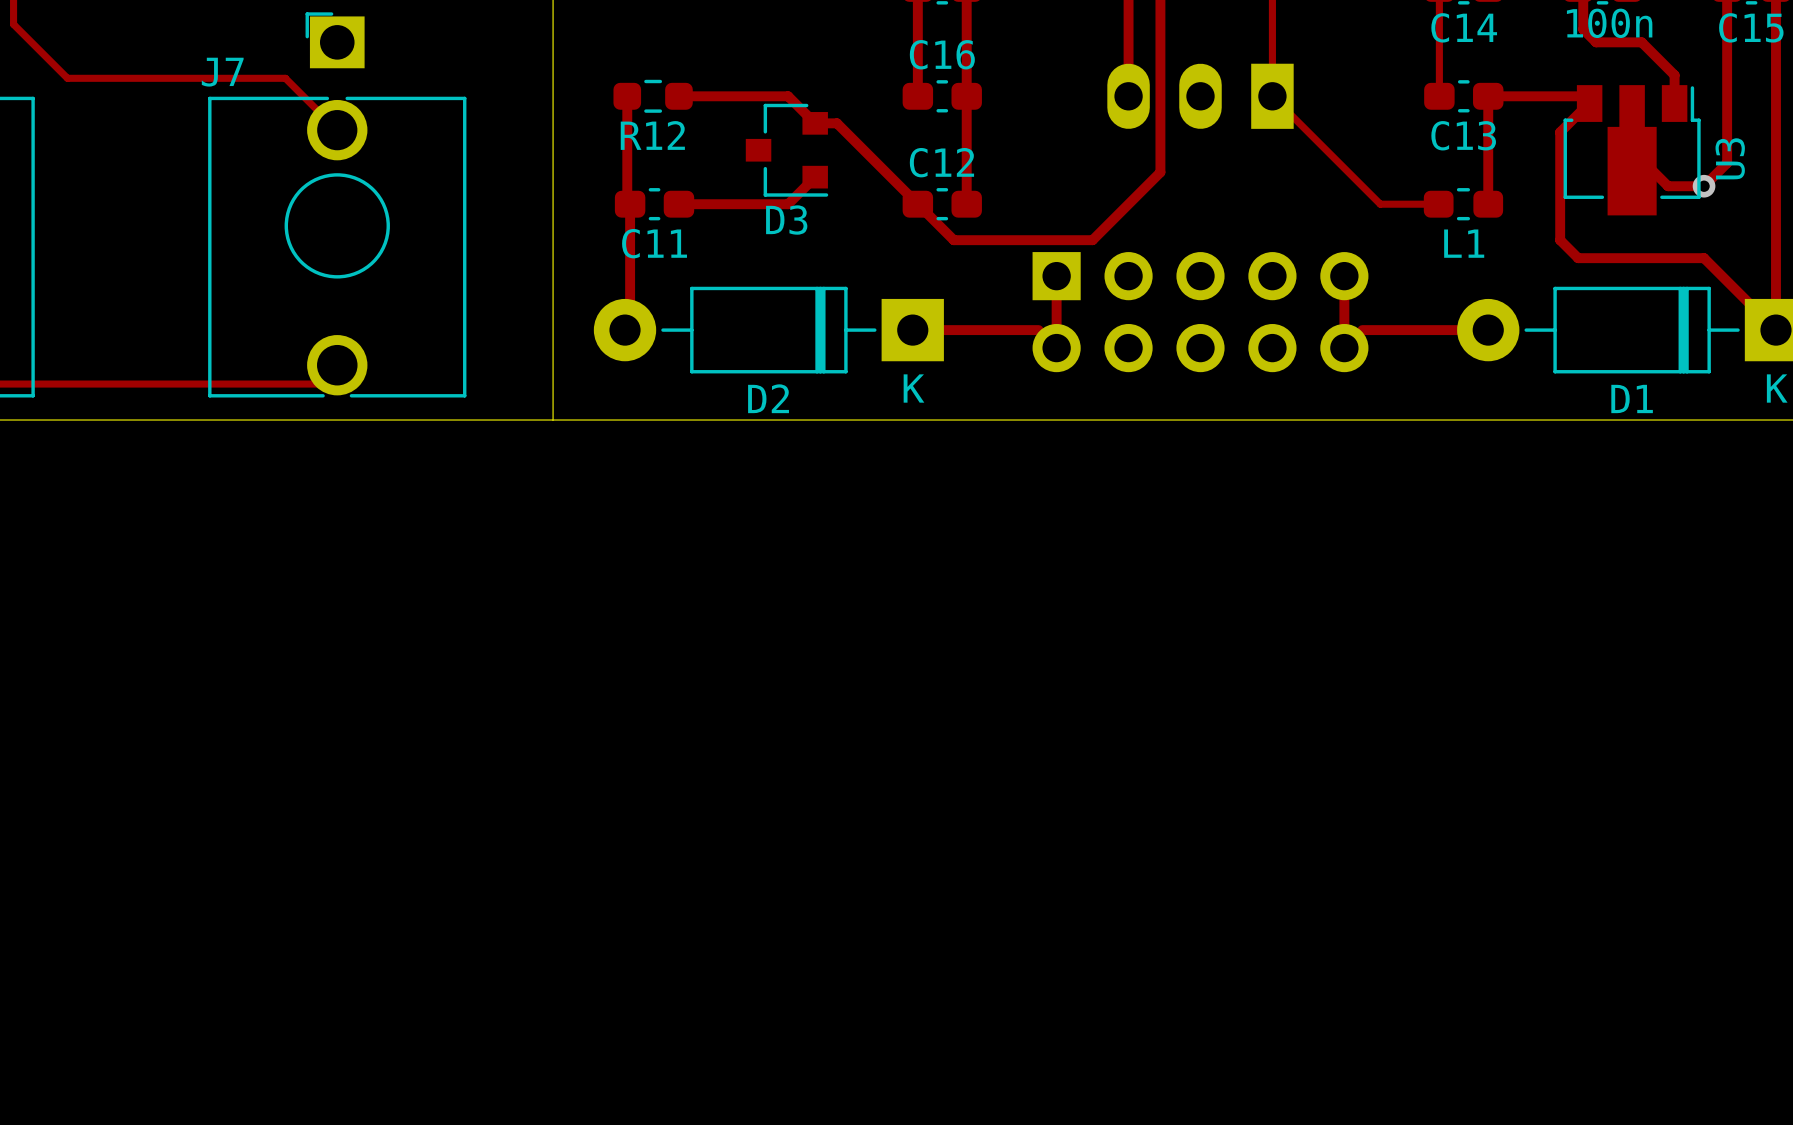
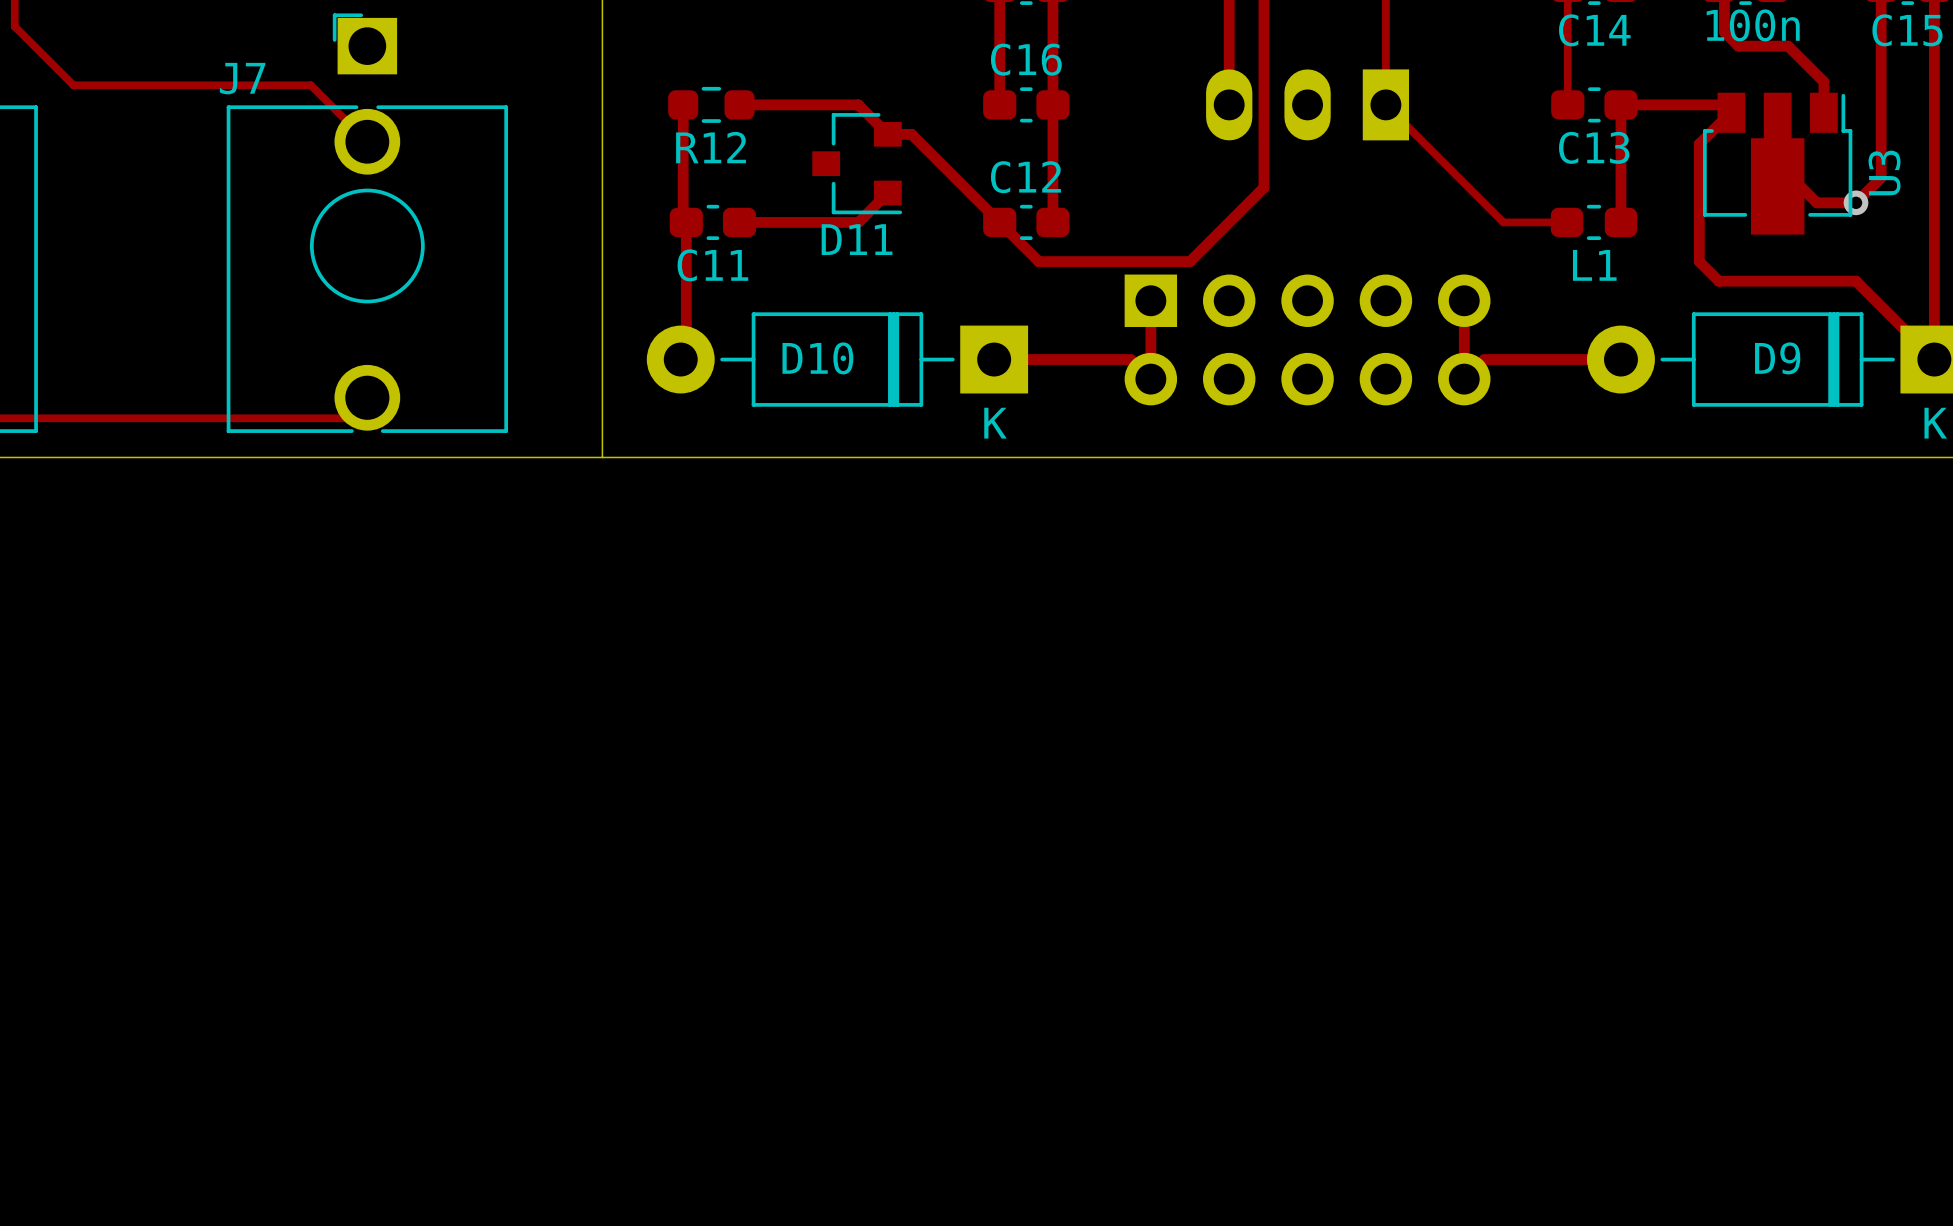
D3 name: D3 (786, 220) -> D11 (857, 239)
D2 name: D2 (768, 398) -> D10 (817, 358)
D1 name: D1 (1632, 398) -> D9 (1777, 358)

